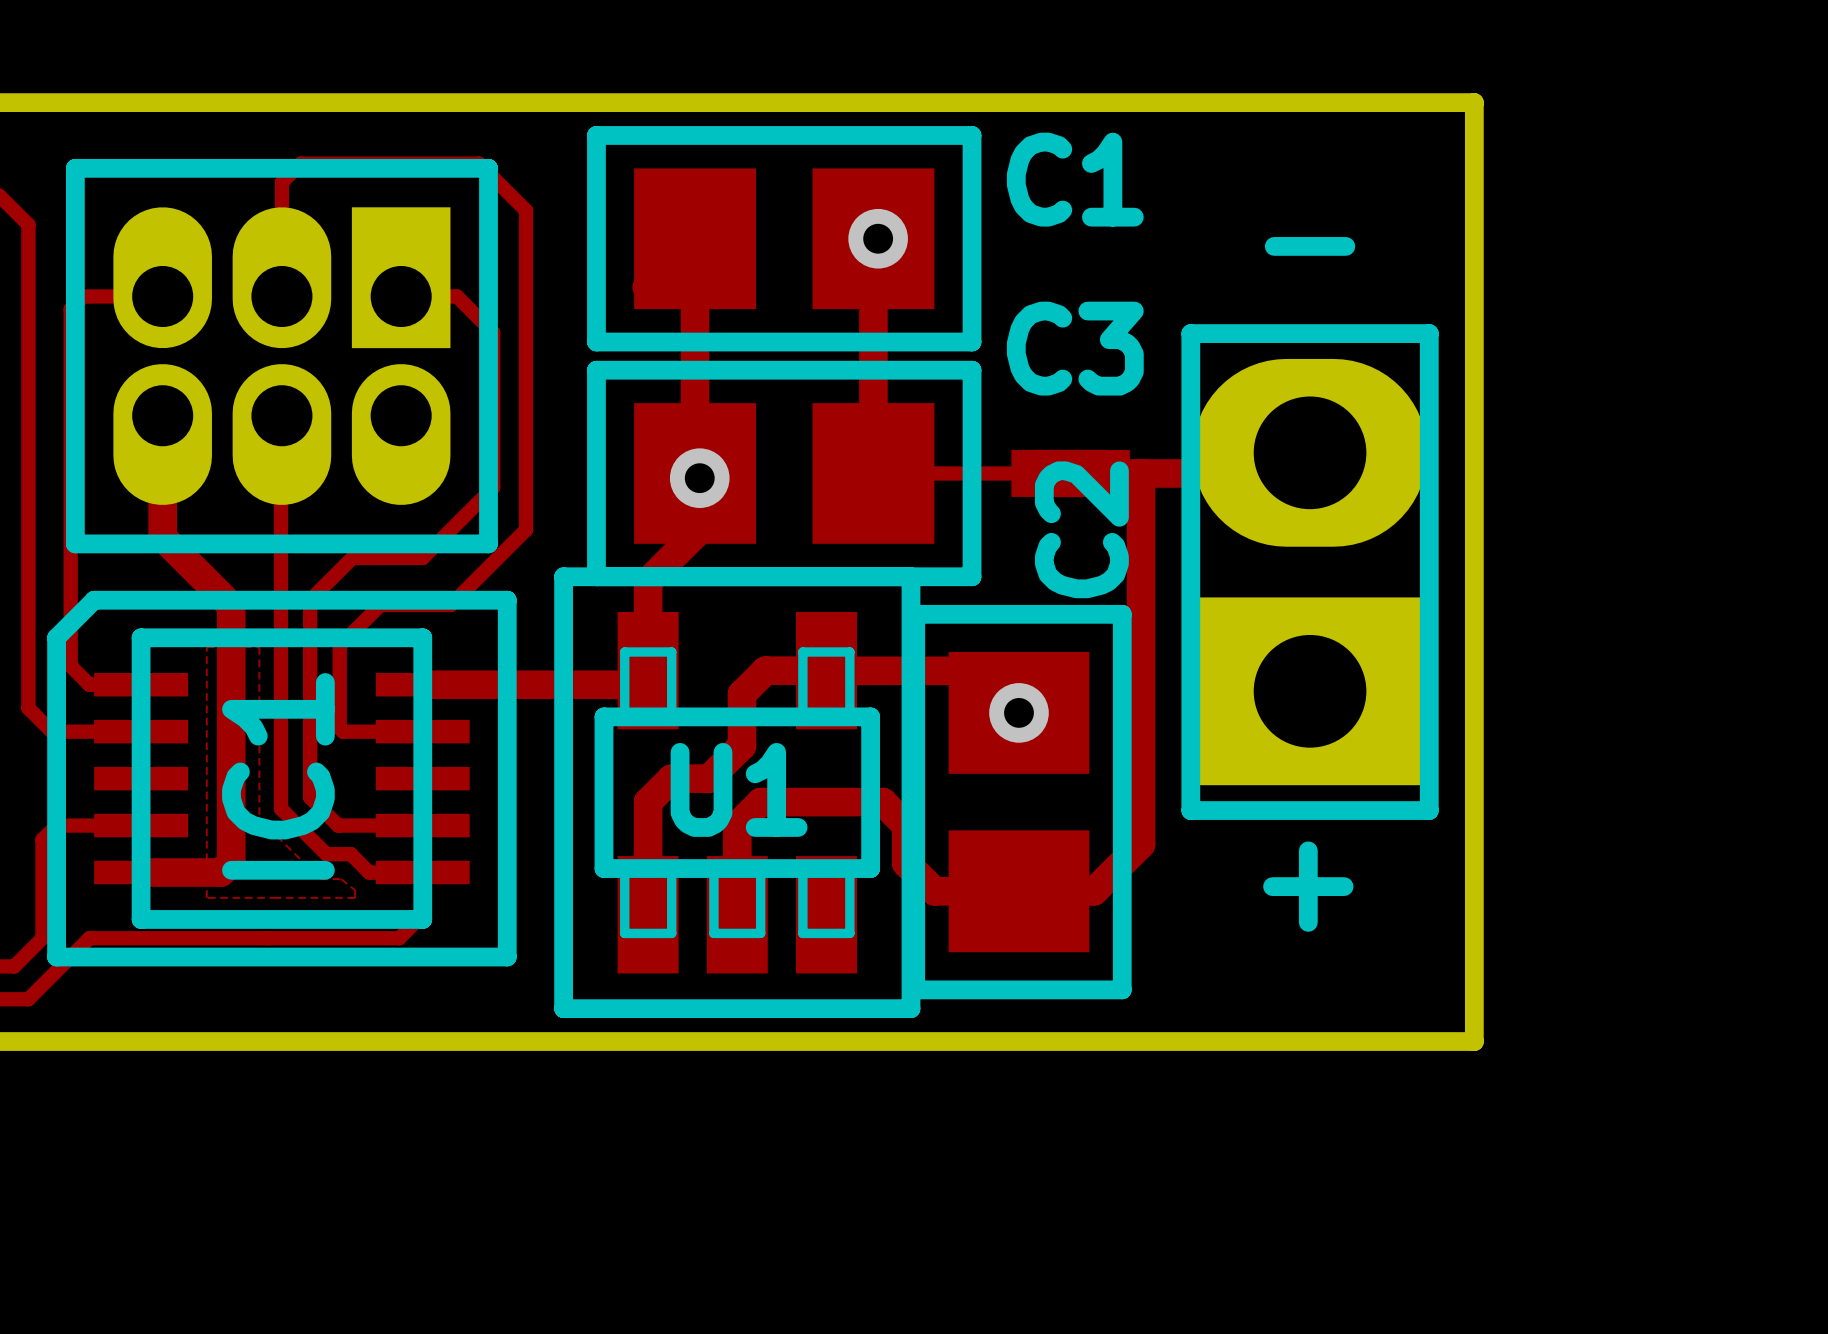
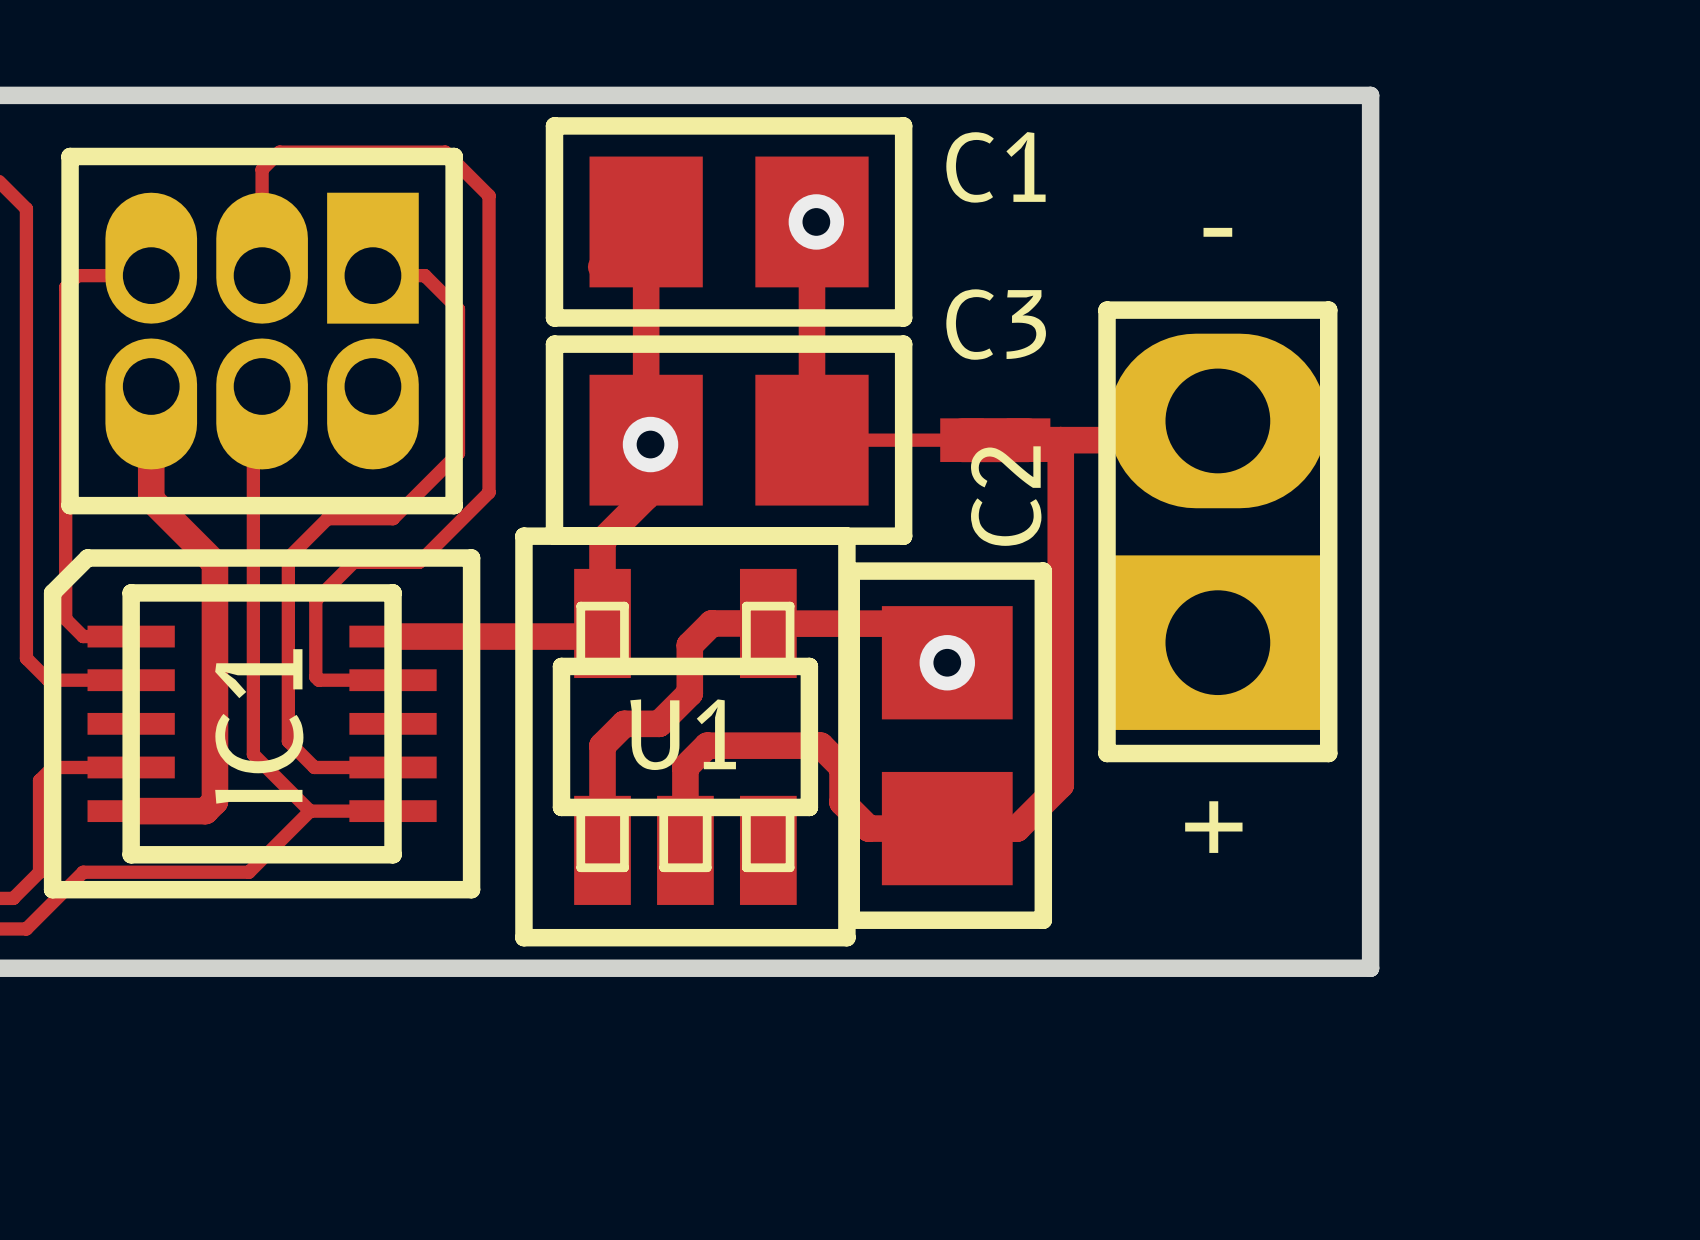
track: (280, 416) (280, 808) (326, 854) (350, 854) (369, 872) -> (260, 387) (253, 395) (253, 754) (310, 811)
zone outline: (206, 647) (259, 647) (259, 819) (320, 879) (341, 879) (355, 890) (355, 897) (206, 897) (206, 647) -> none
track: none -> (310, 811) (343, 811)
track: (422, 872) (422, 914) (399, 938) (267, 938) -> (310, 811) (249, 872)

